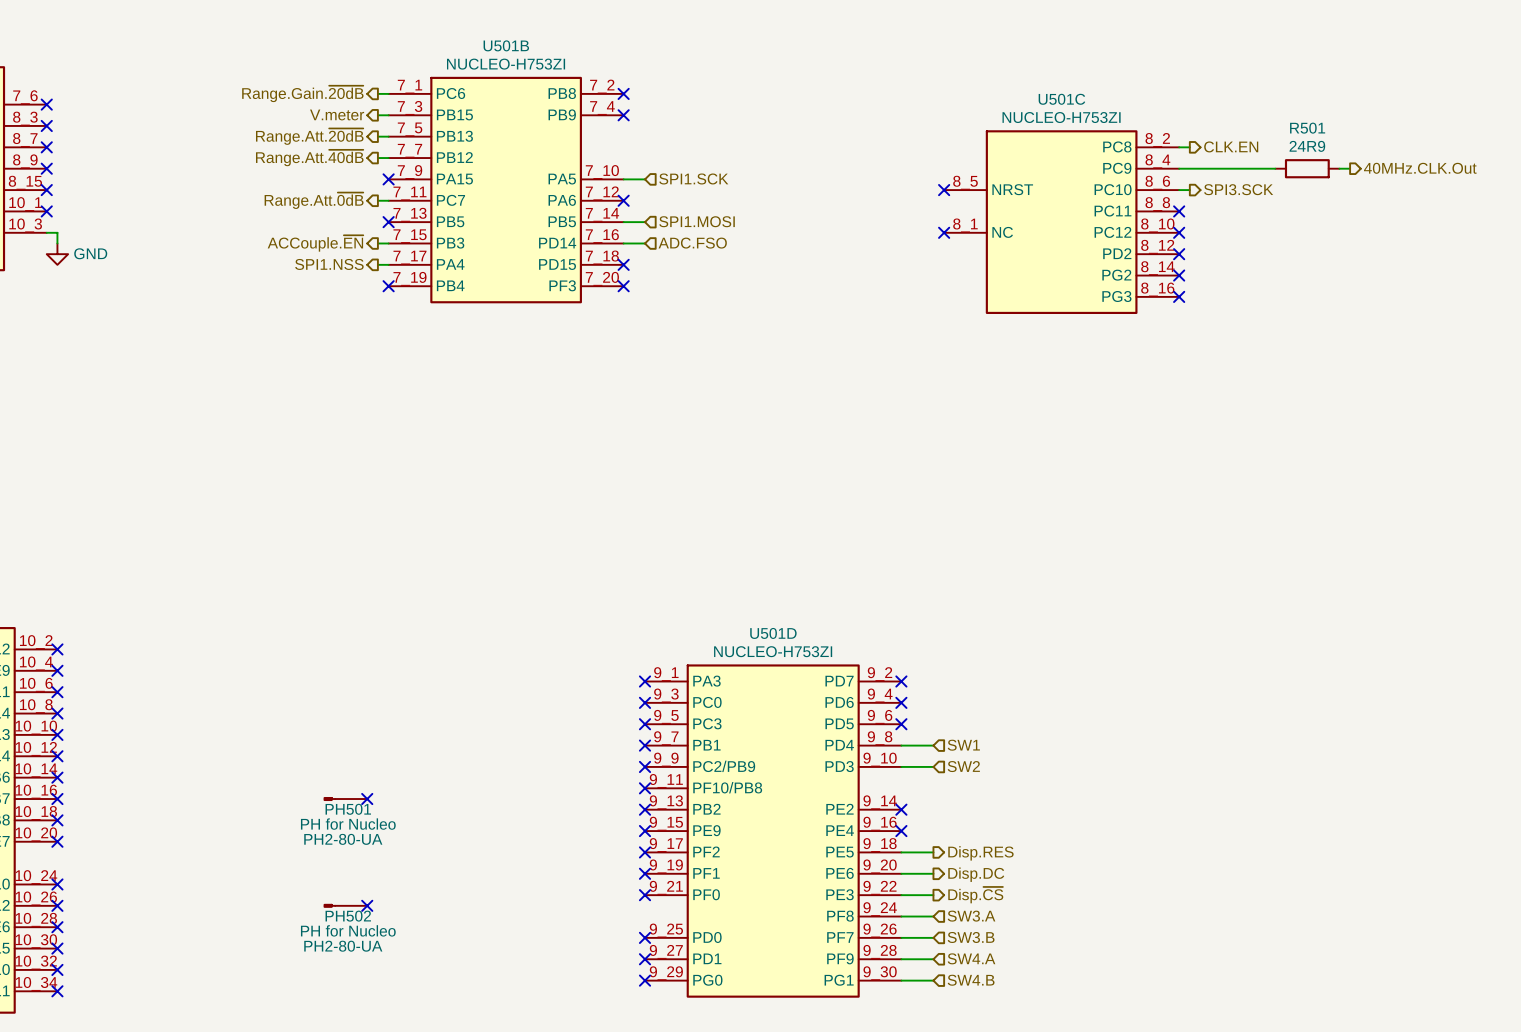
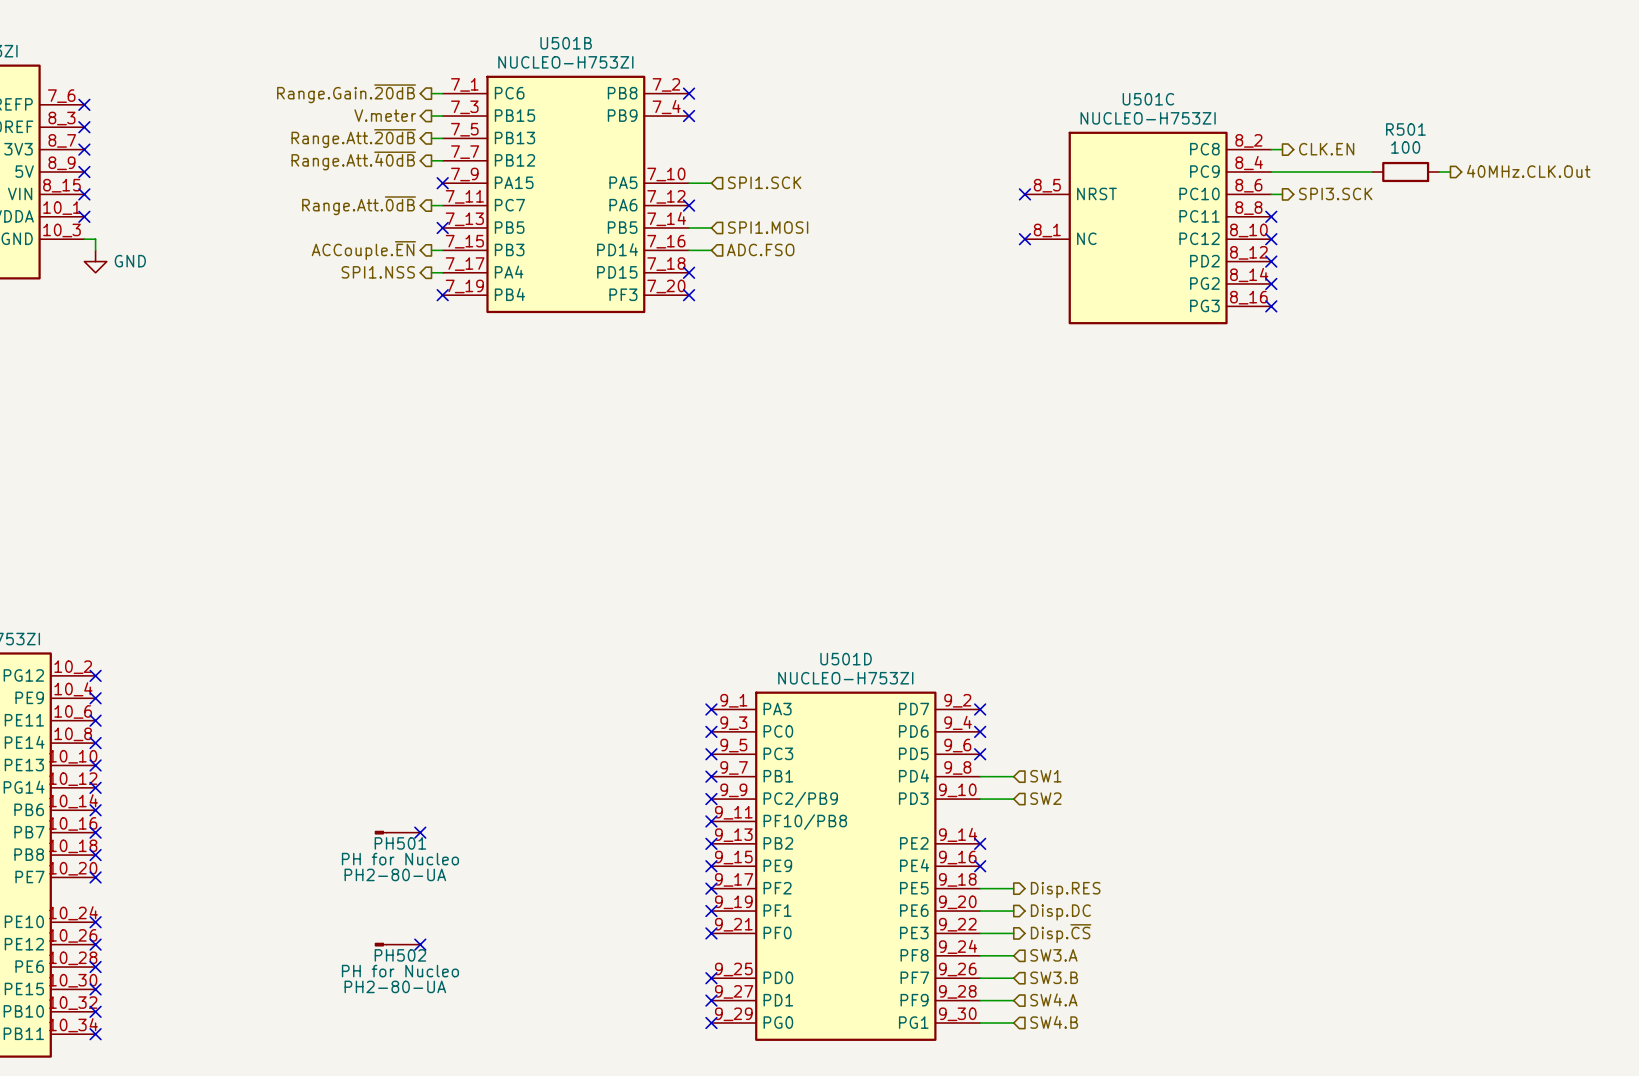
R501 value: 24R9 (1307, 146) -> 100 (1405, 147)

